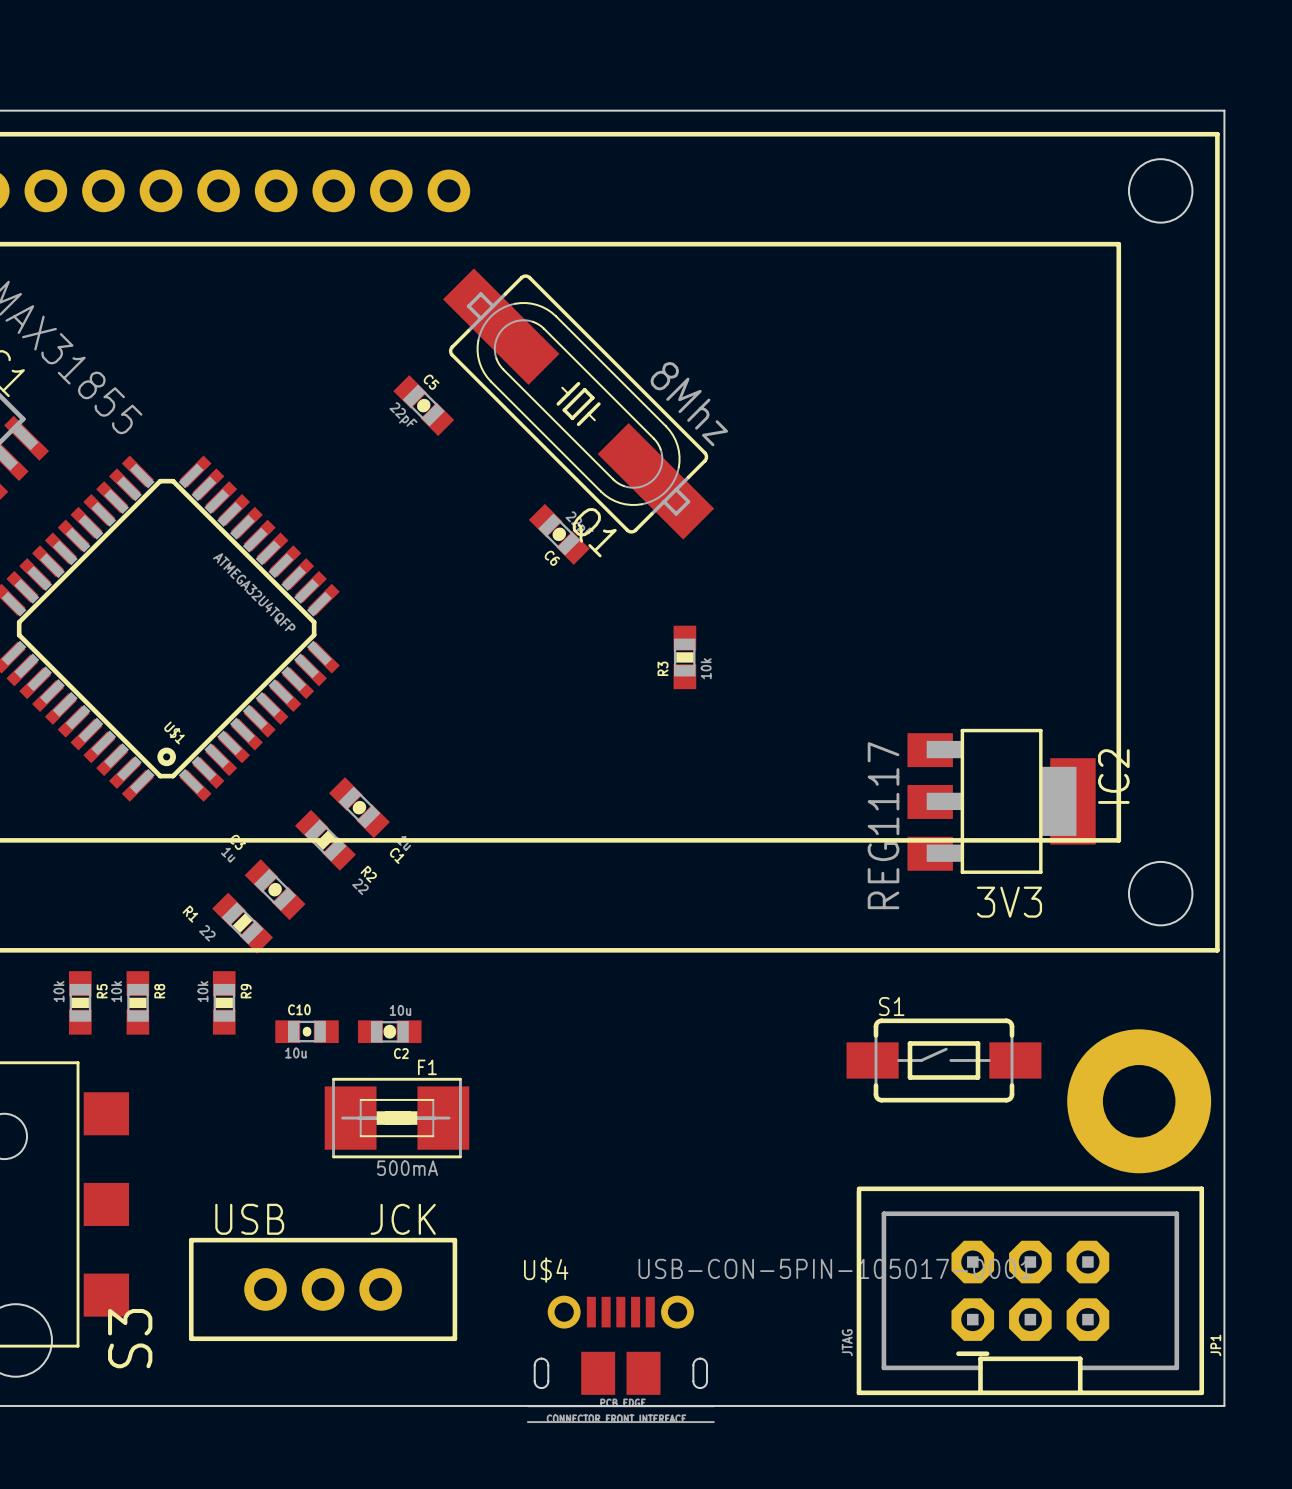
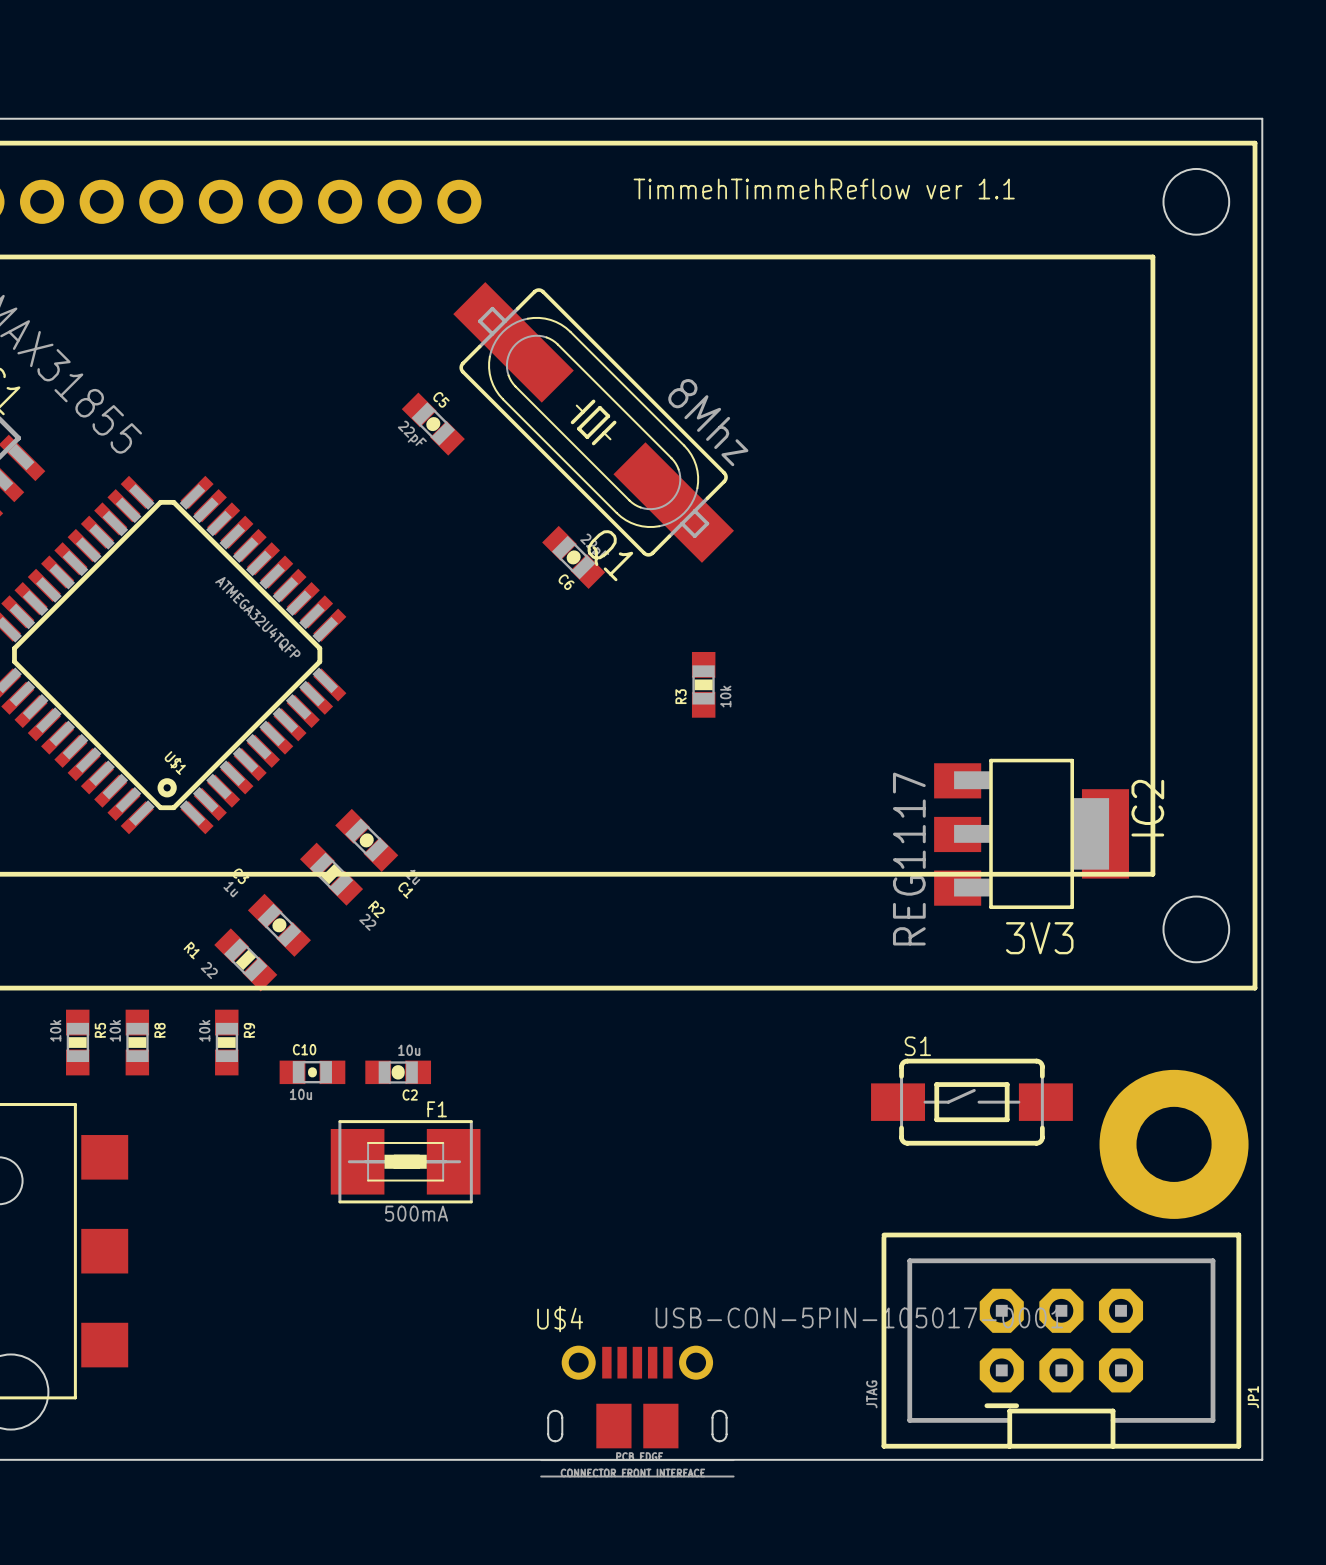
text: none -> TimmehTimmehReflow ver 1.1 (824, 189)
text: USB (249, 1219) -> none
text: JCK (403, 1219) -> none
S3: (323, 1289) -> none

